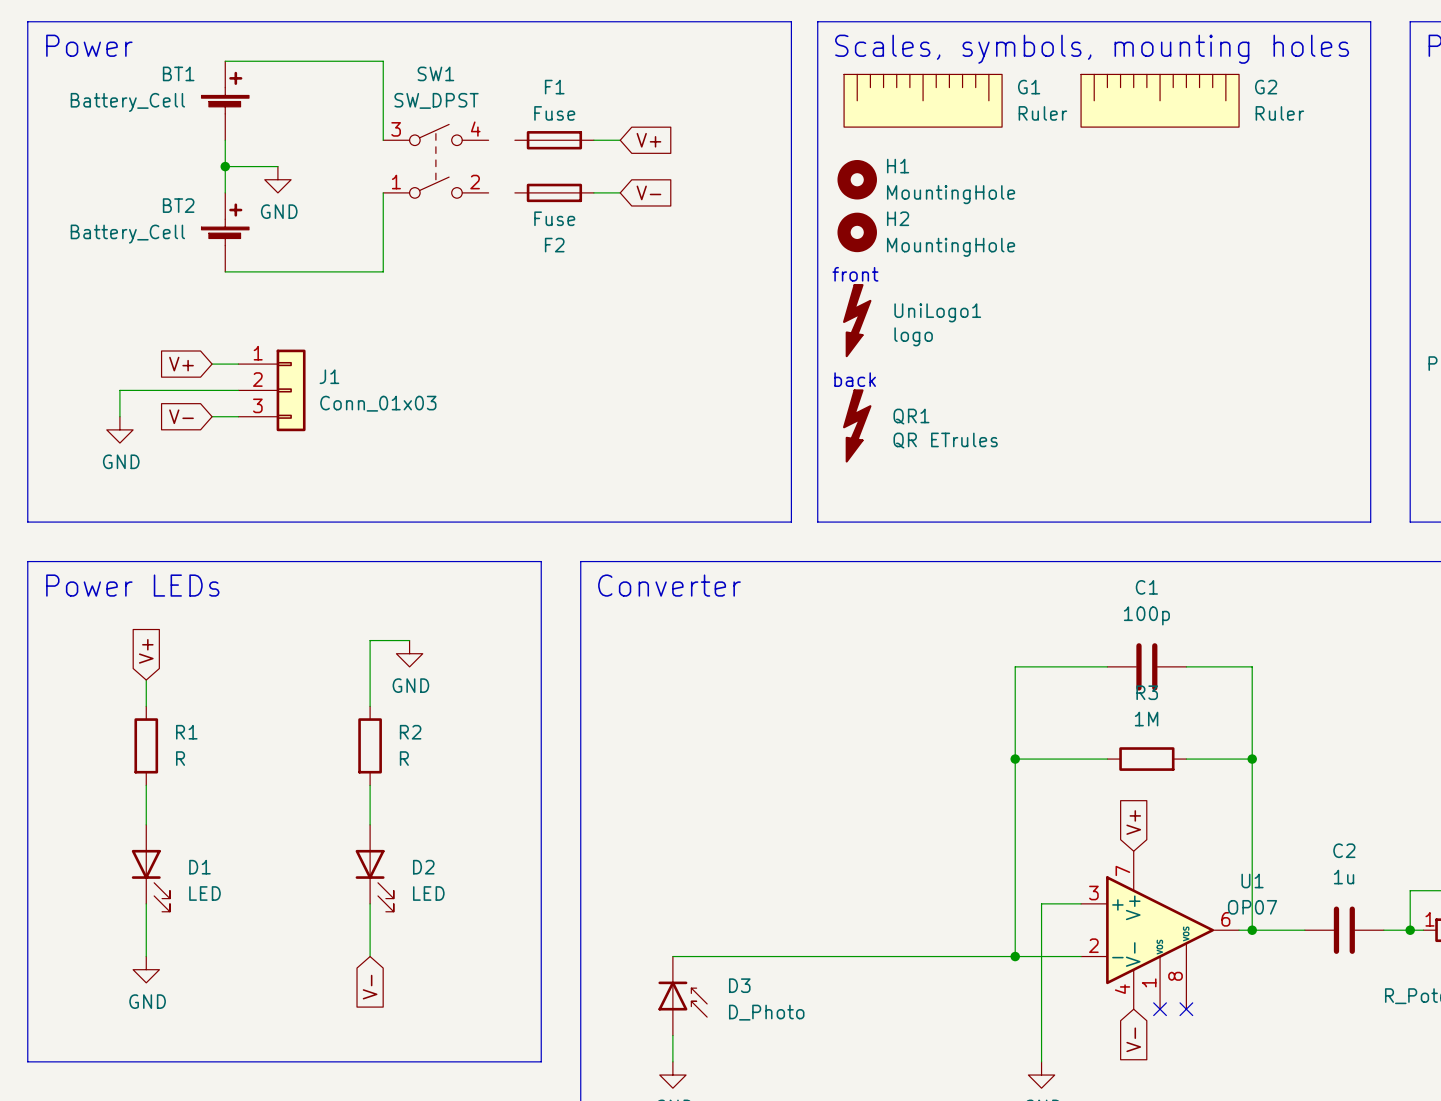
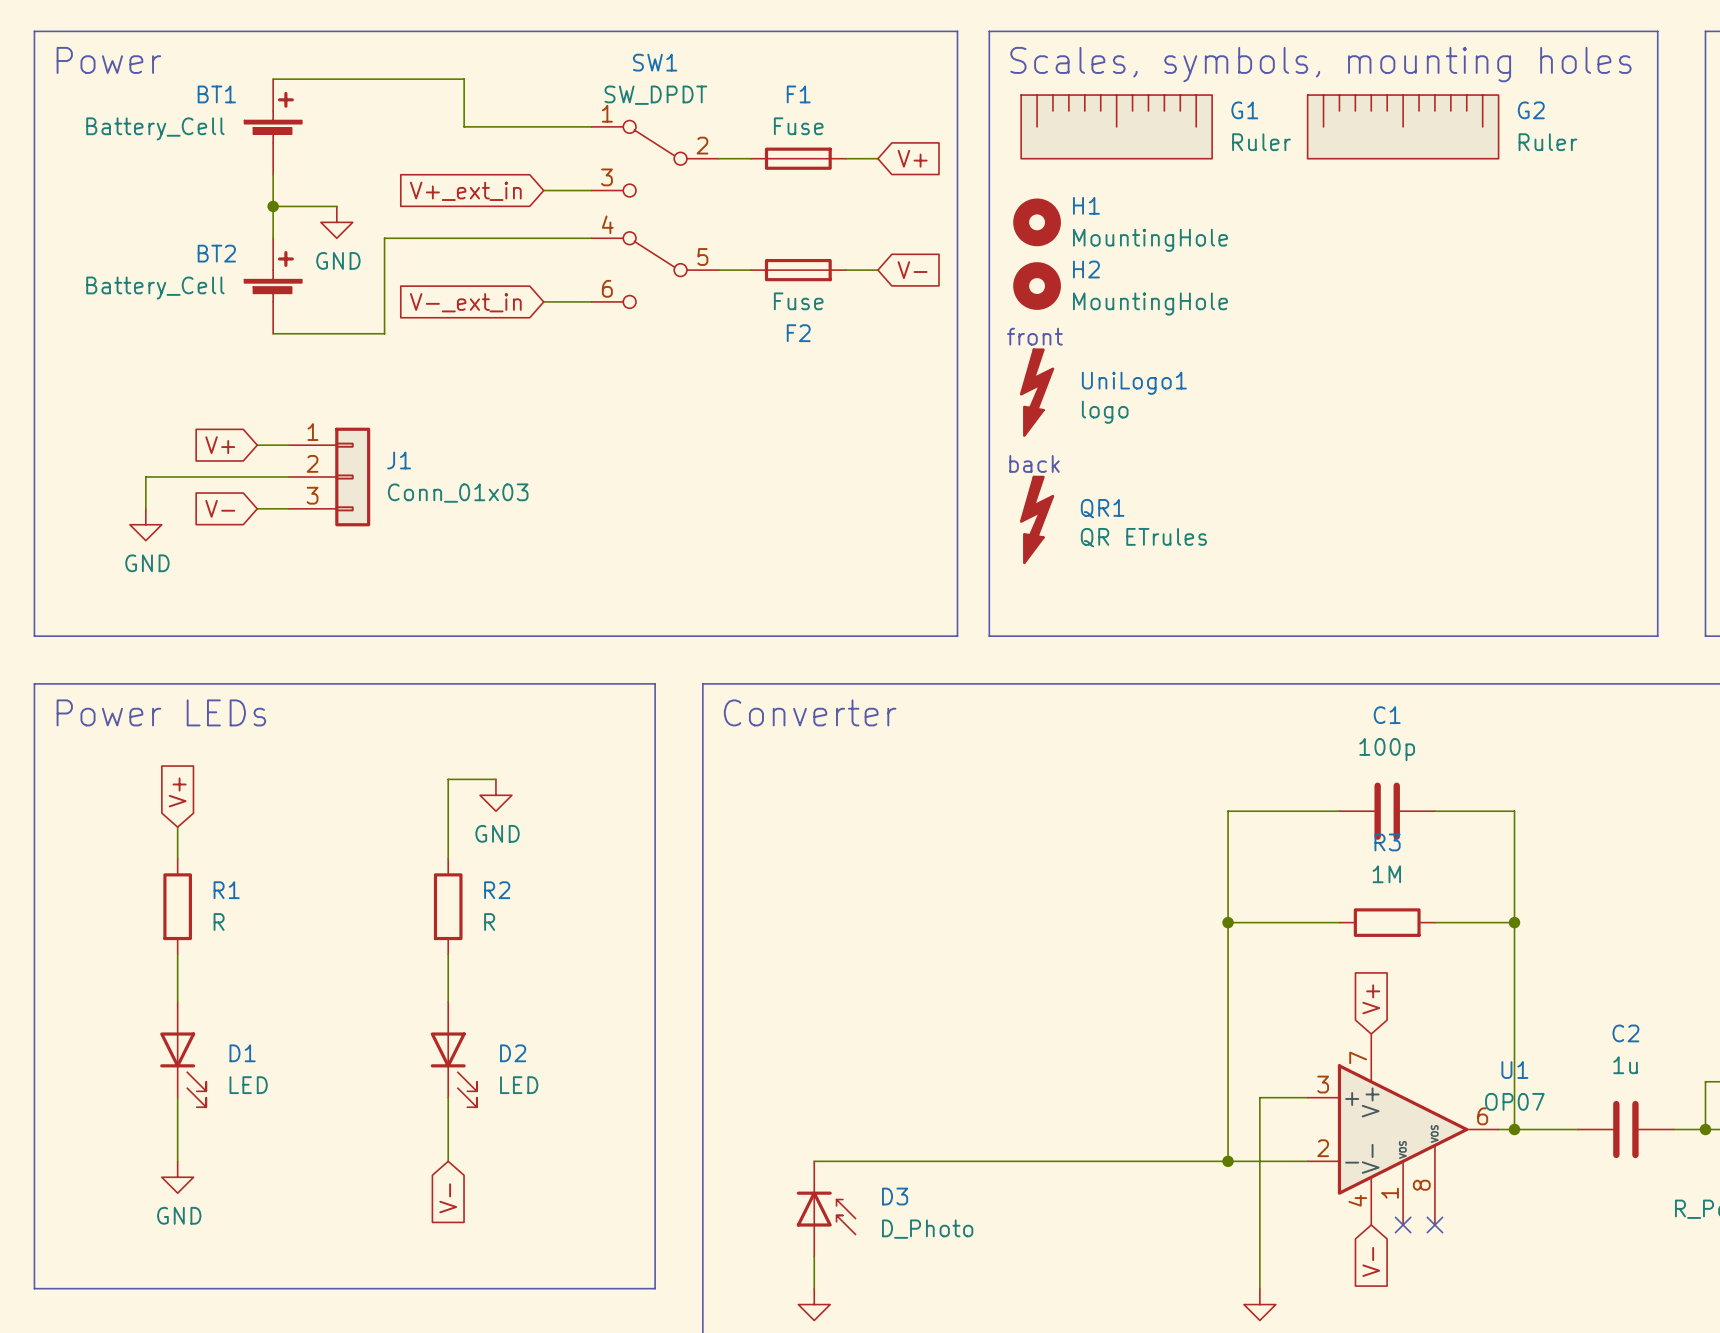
SW1 name position: SW1 (435, 73) -> SW1 (655, 62)
wire: (383, 100) (383, 140) -> (464, 126) (591, 126)
SW1 value: SW_DPST (436, 100) -> SW_DPDT (655, 95)
SW1 symbol: [383, 124, 489, 199] -> [591, 120, 719, 309]
wire: none -> (846, 158) (877, 158)
F1 position: (554, 140) -> (798, 158)
wire: (593, 140) (620, 140) -> (718, 158) (750, 158)
global label position: V+ (648, 140) -> V+ (912, 158)
wire: none -> (543, 190) (591, 190)
global label: none -> V+_ext_in (465, 191)
wire: (383, 192) (383, 271) (317, 271) -> (591, 238) (384, 238) (384, 333)
F2 position: (554, 192) -> (798, 270)
wire: (593, 192) (620, 192) -> (718, 270) (750, 270)
global label position: V- (648, 192) -> V- (912, 270)
wire: none -> (846, 270) (877, 270)
wire: none -> (543, 301) (591, 301)
global label: none -> V-_ext_in (465, 302)

